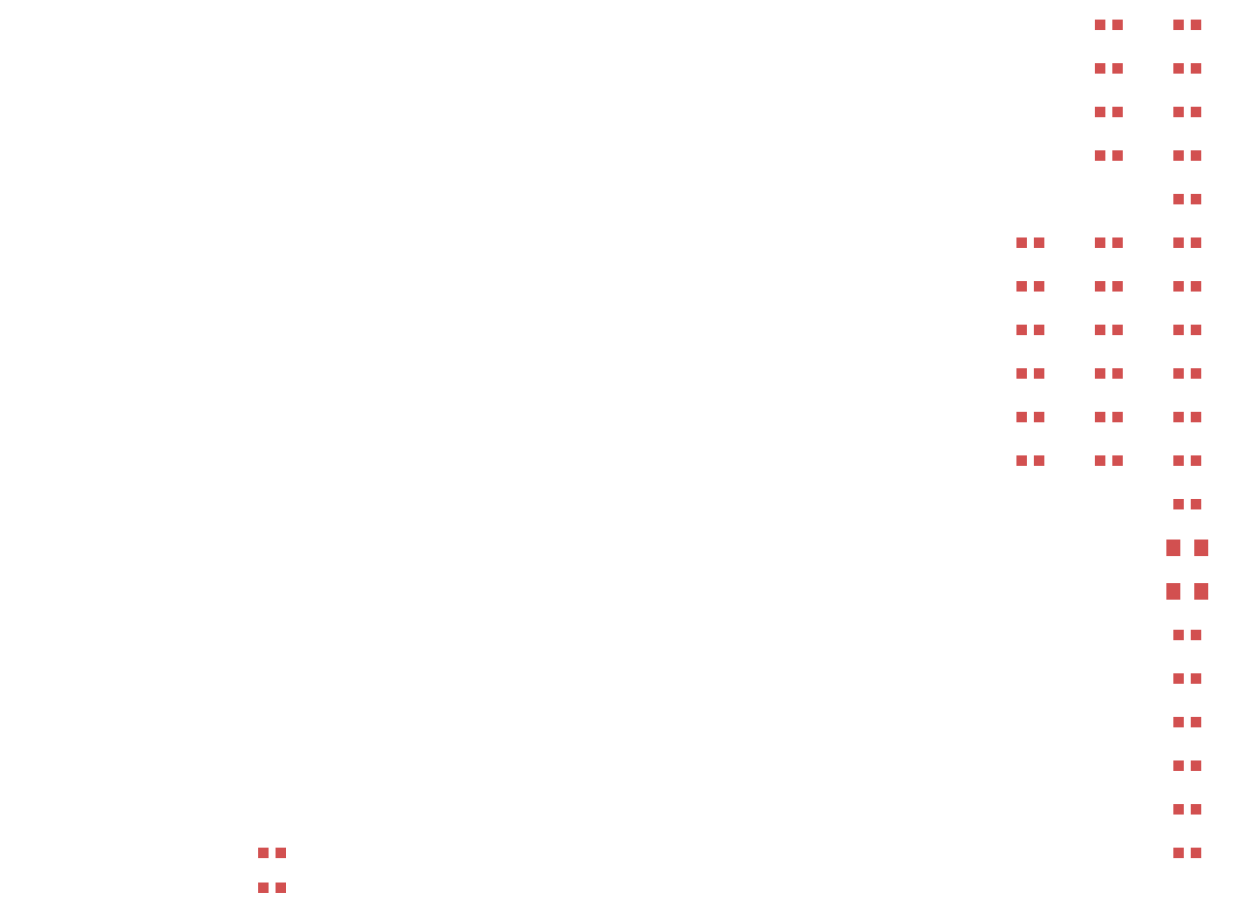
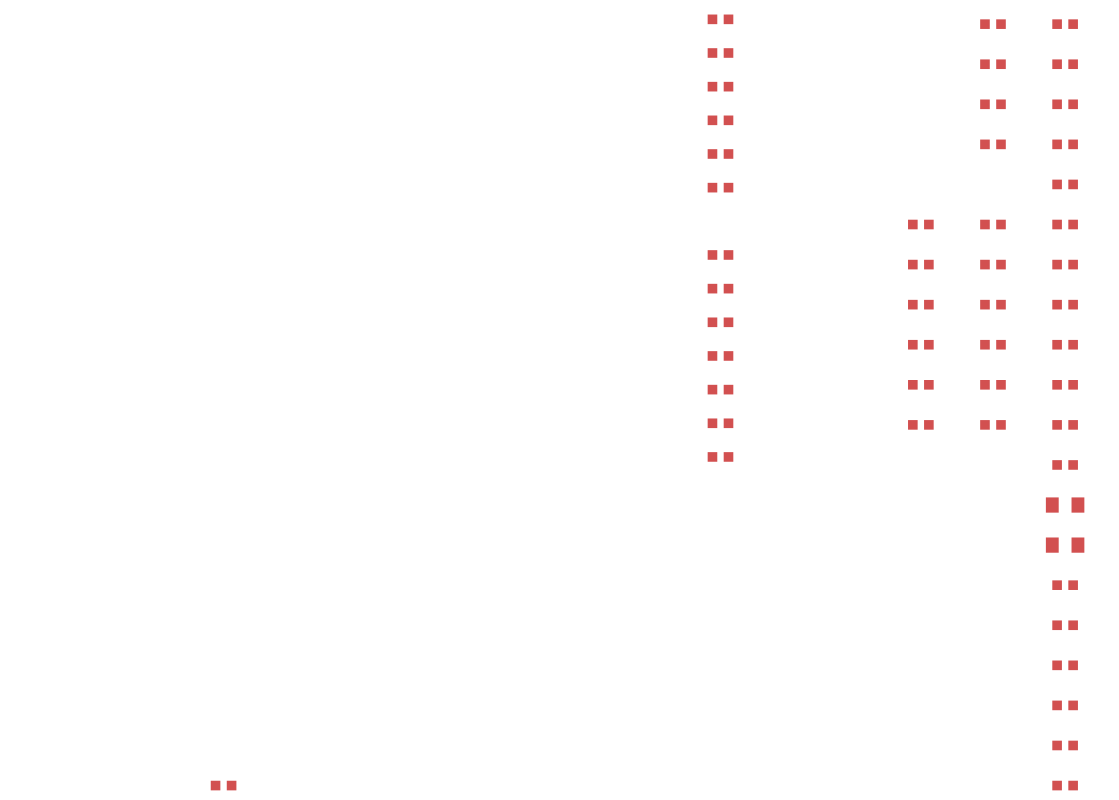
part: none -> (720, 19)
part: none -> (720, 53)
part: none -> (720, 86)
part: none -> (720, 120)
part: none -> (720, 153)
part: none -> (720, 187)
part: none -> (720, 254)
part: none -> (720, 288)
part: none -> (720, 322)
part: none -> (720, 355)
part: none -> (720, 389)
part: none -> (720, 423)
part: none -> (720, 456)

